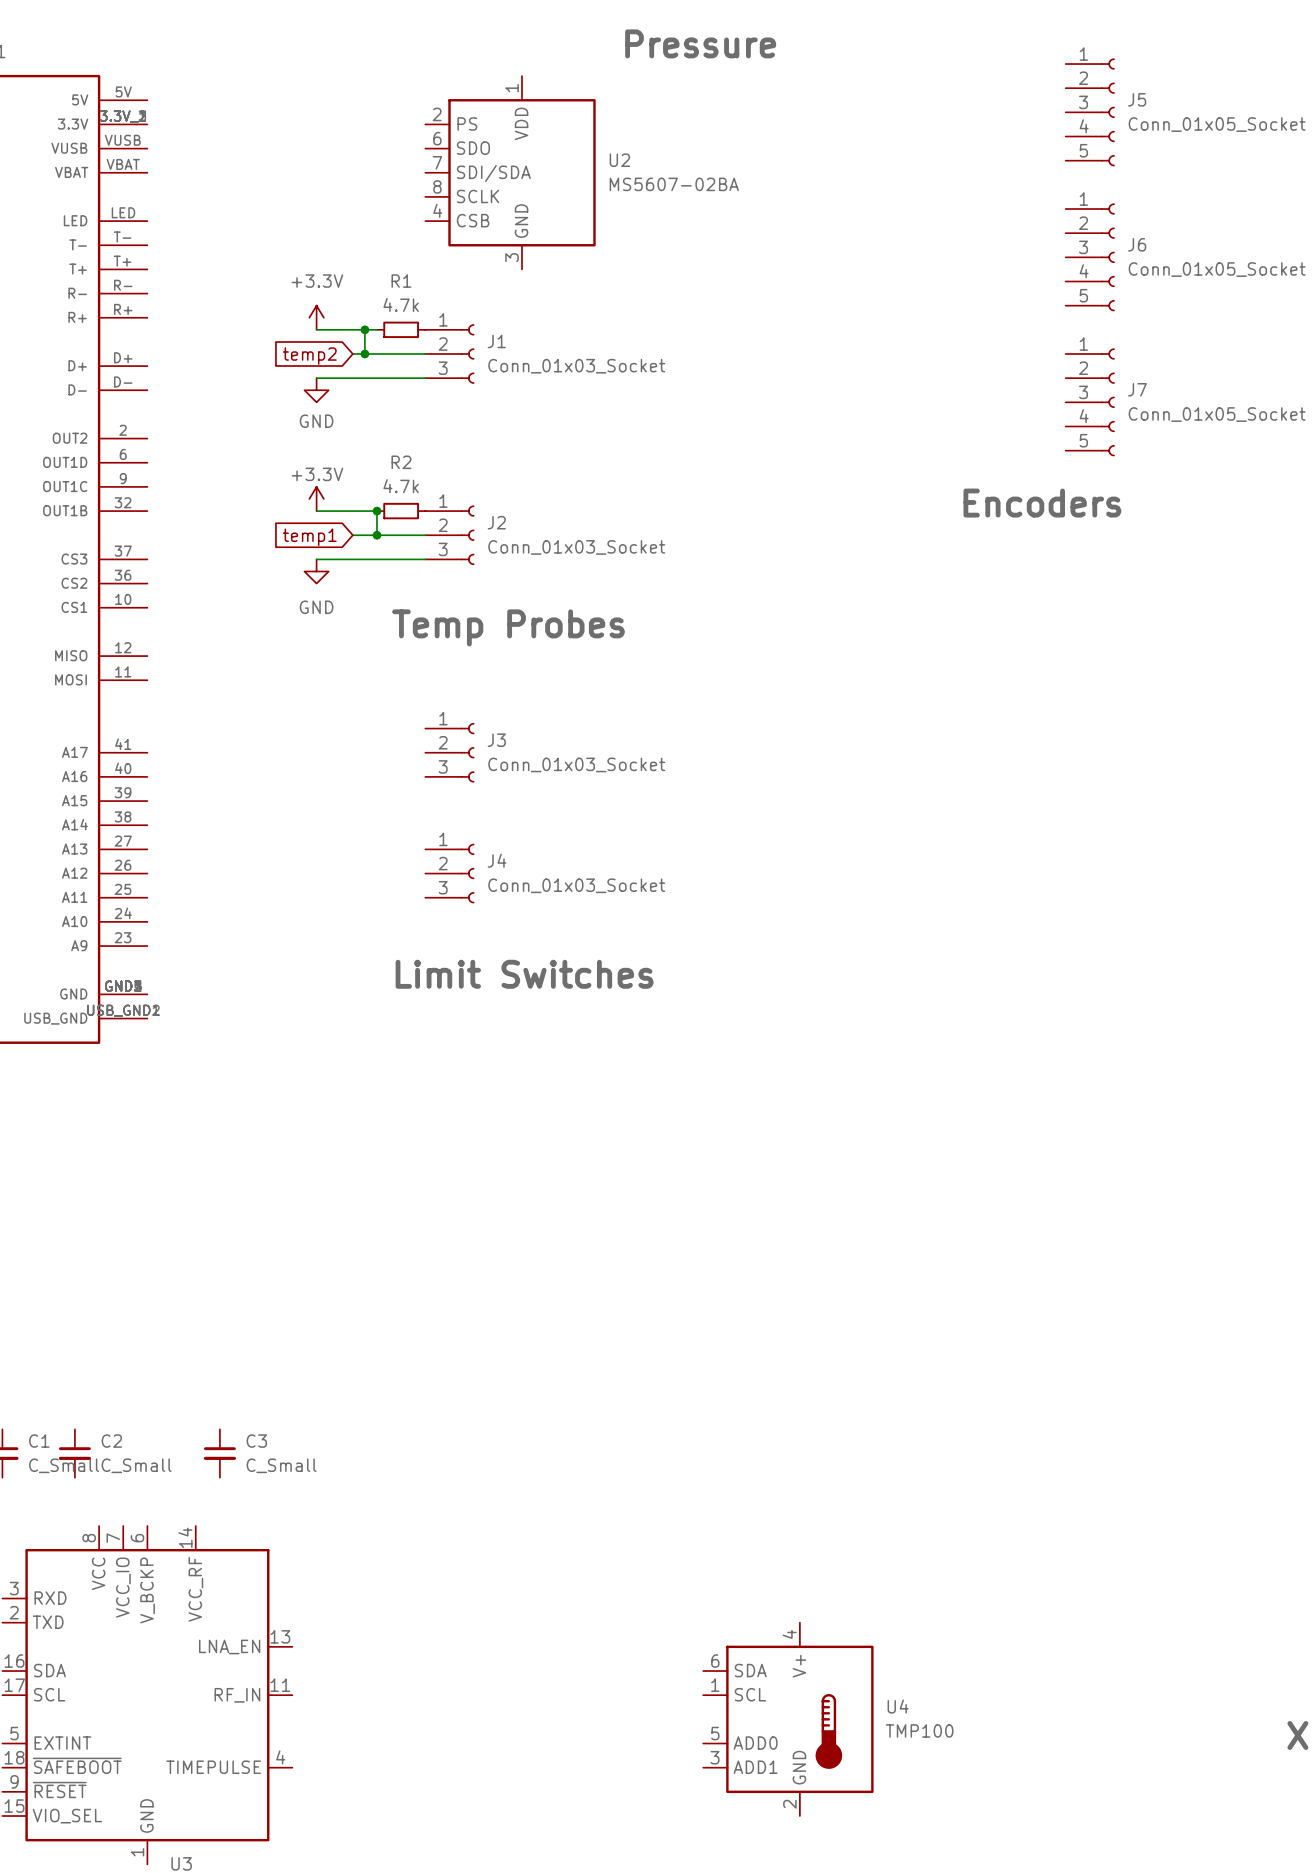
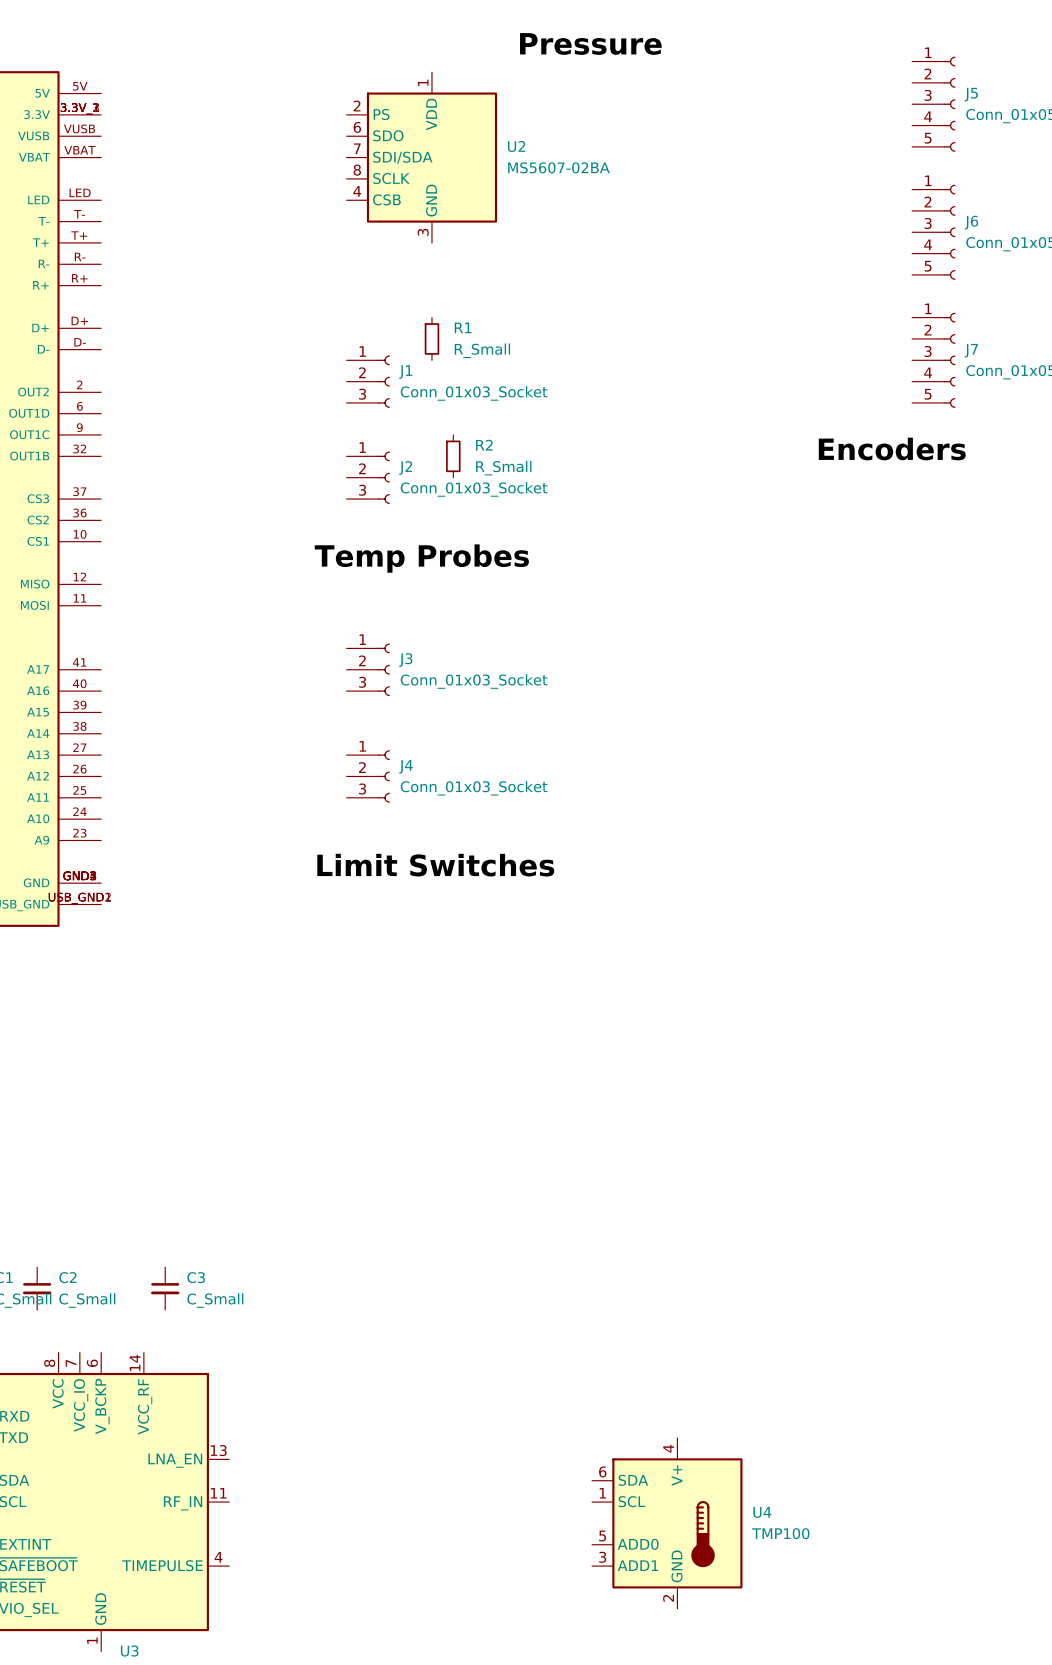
R1 value: 4.7k (401, 304) -> R_Small (482, 350)
power symbol: +3.3V (316, 317) -> none
wire: (316, 329) (376, 329) -> none
wire: (364, 329) (364, 354) -> none
junction: (364, 329) -> none
R1 rotation: 0° (401, 329) -> 90° clockwise (431, 338)
R1 position: (401, 329) -> (431, 338)
wire: (352, 354) (425, 354) -> none
junction: (364, 354) -> none
J1 position: (449, 354) -> (368, 381)
global label: temp2 (309, 356) -> none
wire: (316, 378) (425, 378) -> none
power symbol: GND (316, 390) -> none
R2 value: 4.7k (401, 486) -> R_Small (503, 468)
power symbol: +3.3V (316, 498) -> none
wire: (316, 511) (376, 511) (376, 535) -> none
junction: (376, 511) -> none
R2 rotation: 0° (401, 511) -> 90° clockwise (453, 456)
R2 position: (401, 511) -> (453, 456)
wire: (352, 535) (425, 535) -> none
junction: (376, 535) -> none
global label: temp1 (309, 537) -> none
wire: (316, 559) (425, 559) -> none
power symbol: GND (316, 571) -> none

